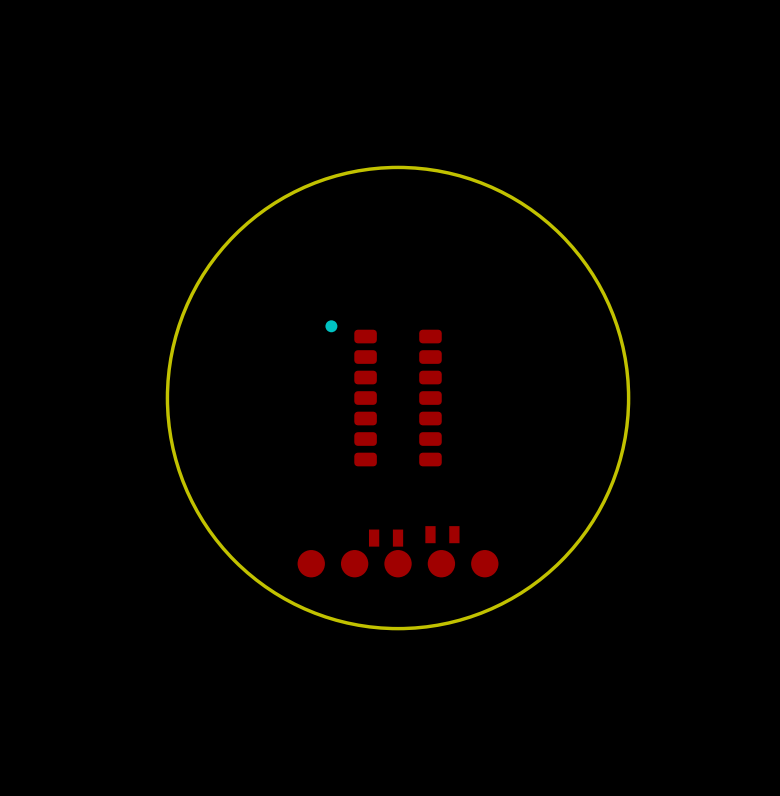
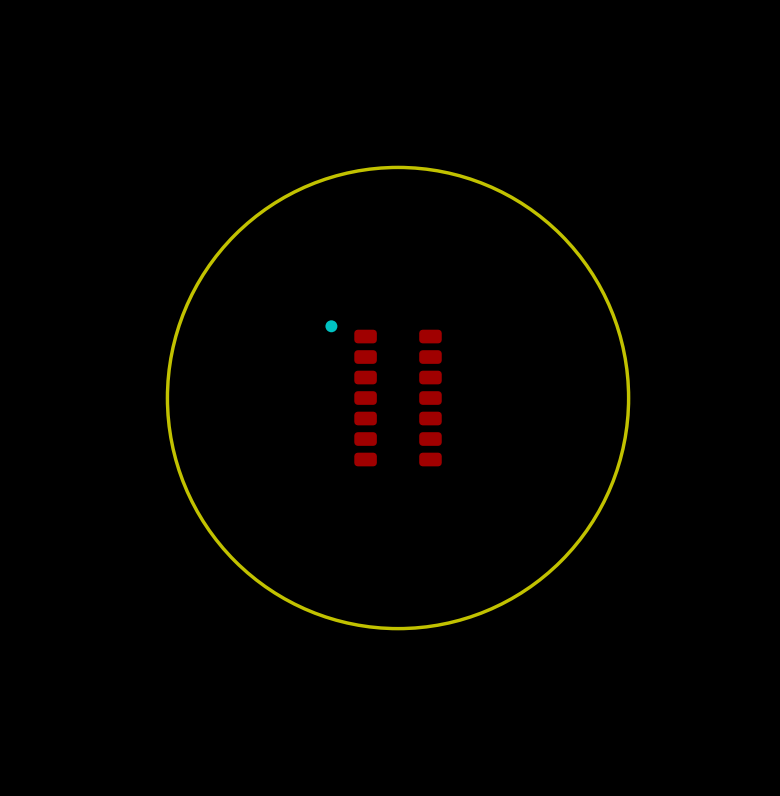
part: (442, 534) -> none
part: (386, 538) -> none
part: (311, 563) -> none
part: (354, 563) -> none
part: (398, 563) -> none
part: (441, 563) -> none
part: (484, 563) -> none

